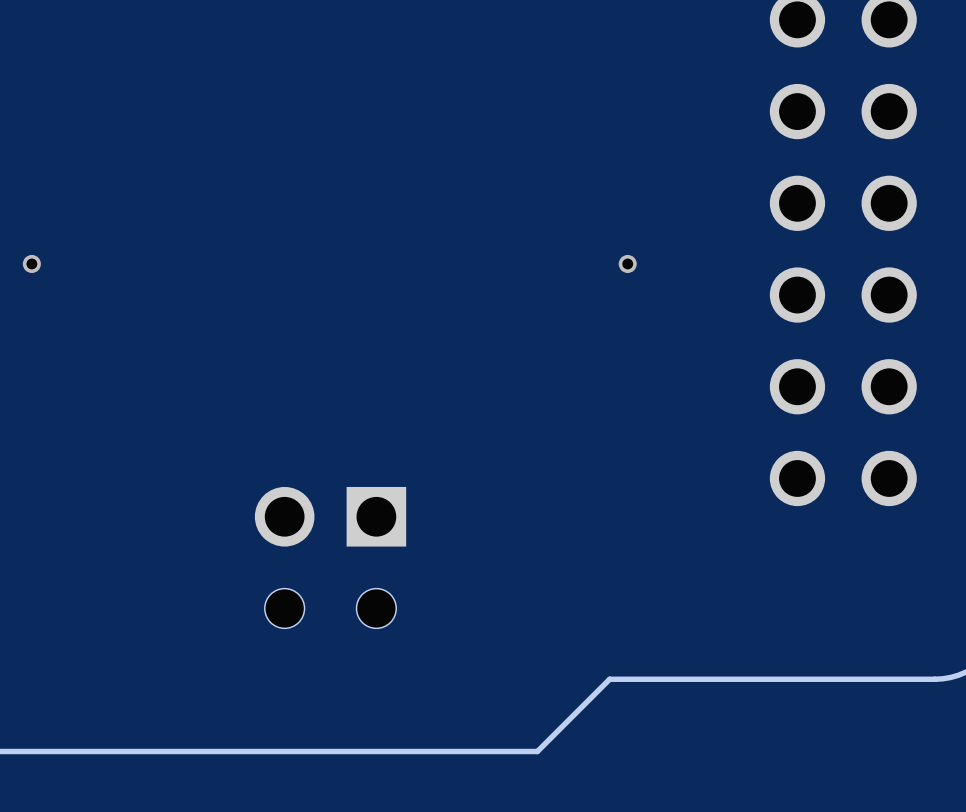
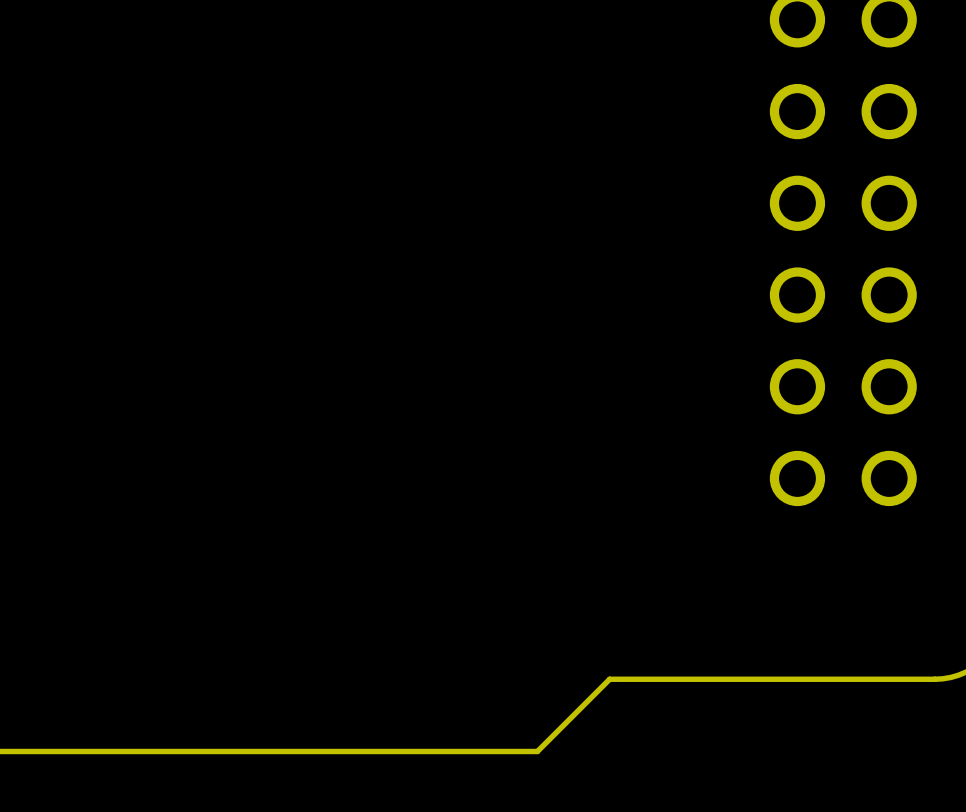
via: (31, 263) -> none
via: (627, 263) -> none
part: (330, 557) -> none

